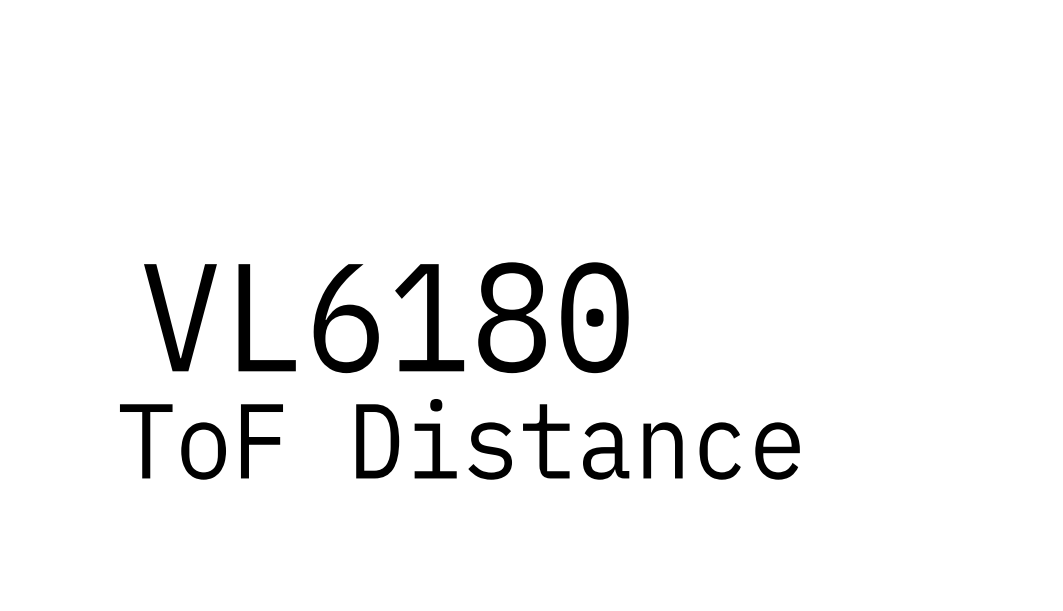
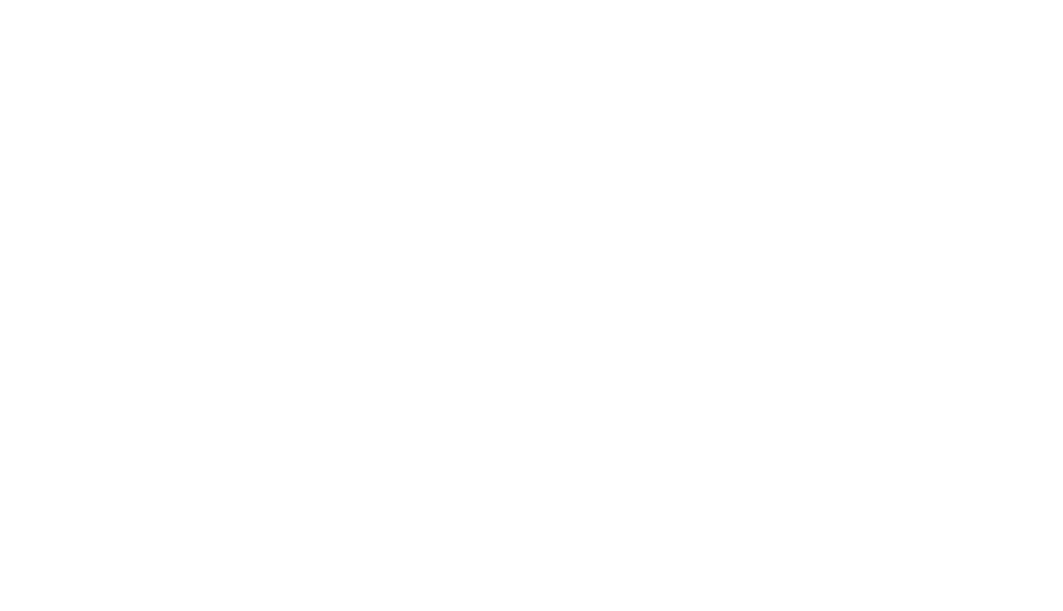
text: VL6180 (386, 317) -> none
text: ToF Distance (459, 439) -> none

